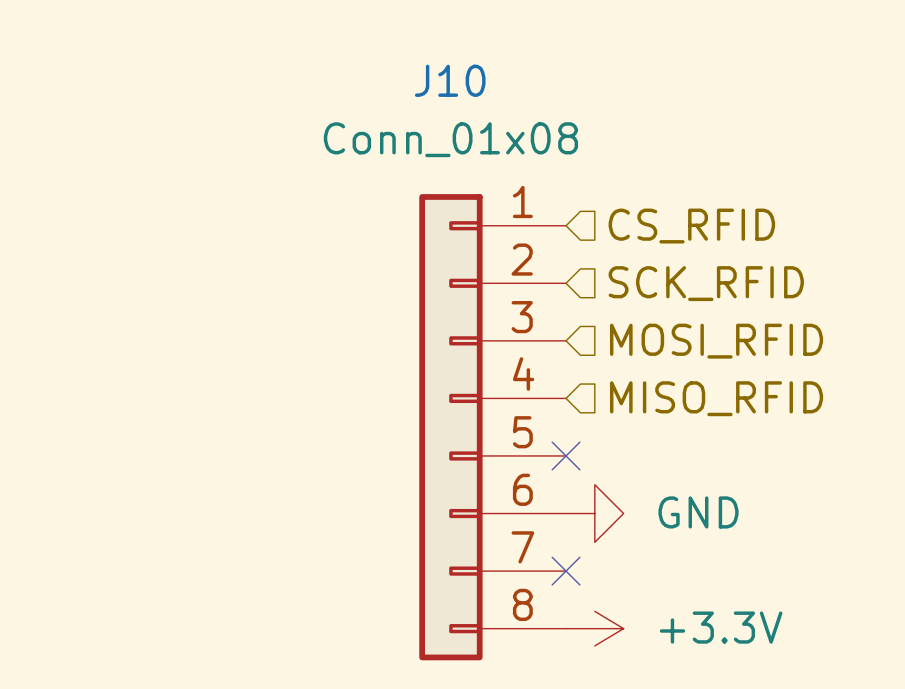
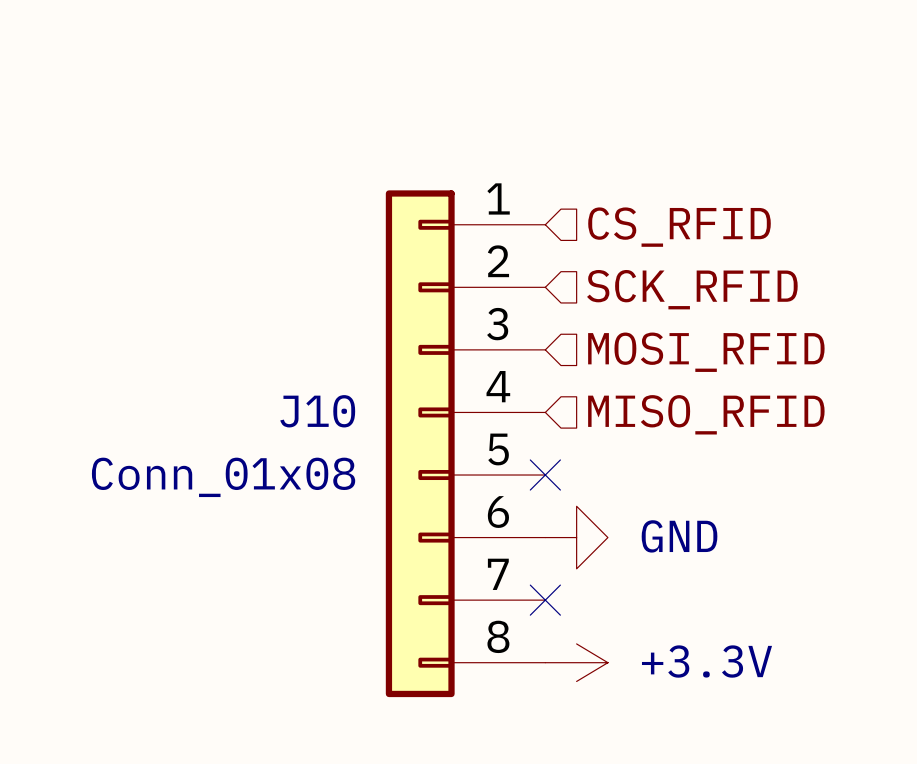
J10 name position: J10 (450, 80) -> J10 (317, 411)
J10 value position: Conn_01x08 (450, 139) -> Conn_01x08 (223, 477)

